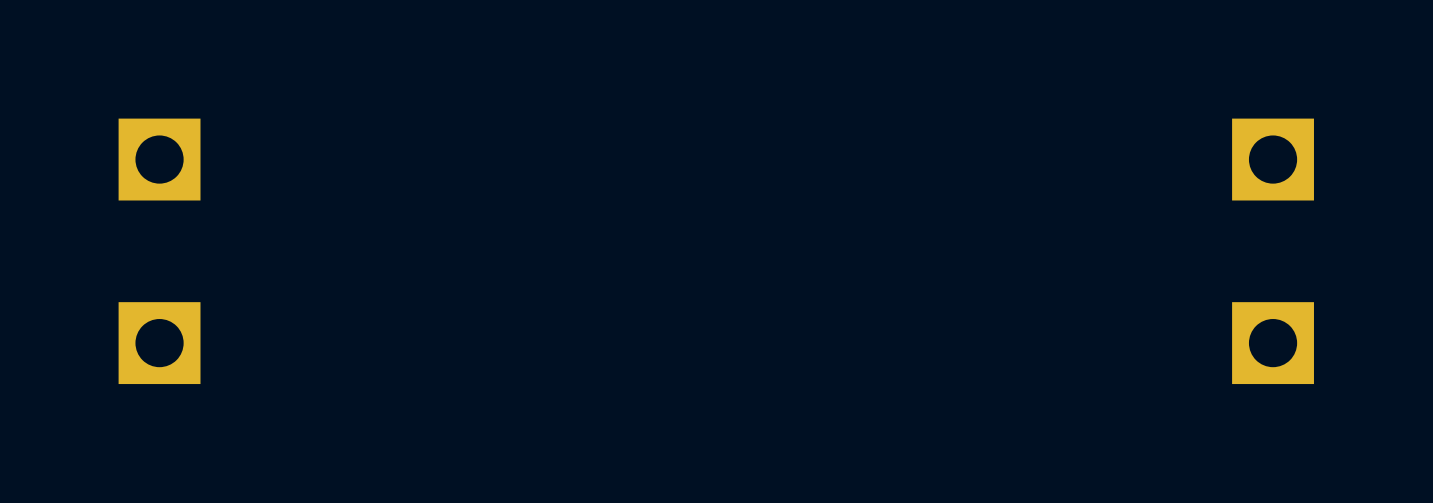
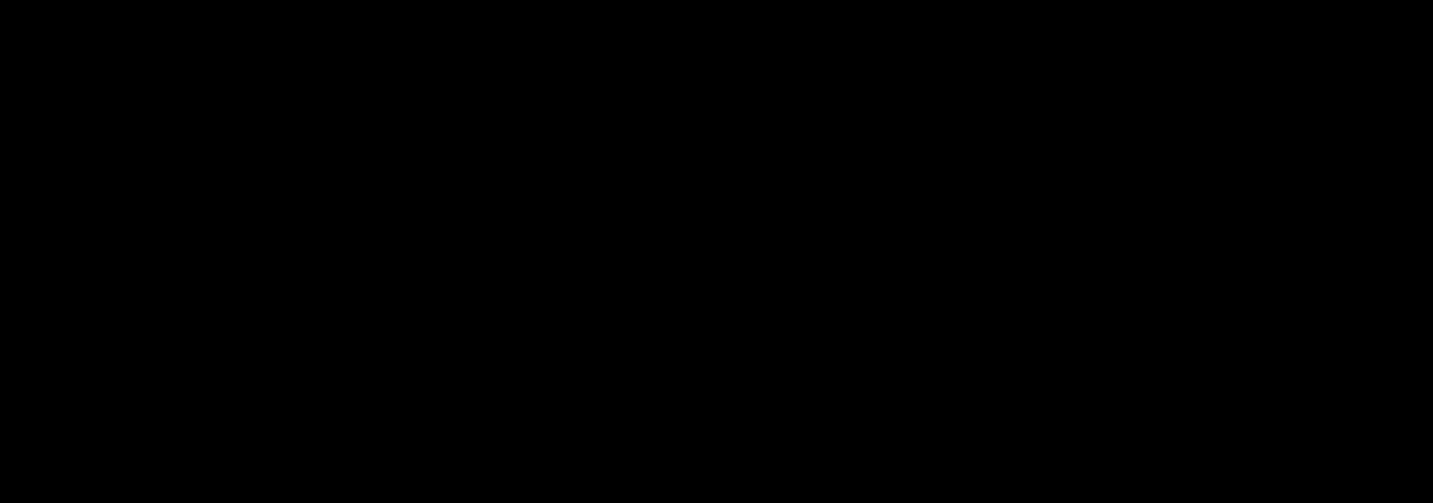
part: (159, 159) -> none
part: (1273, 159) -> none
part: (159, 343) -> none
part: (1273, 343) -> none

